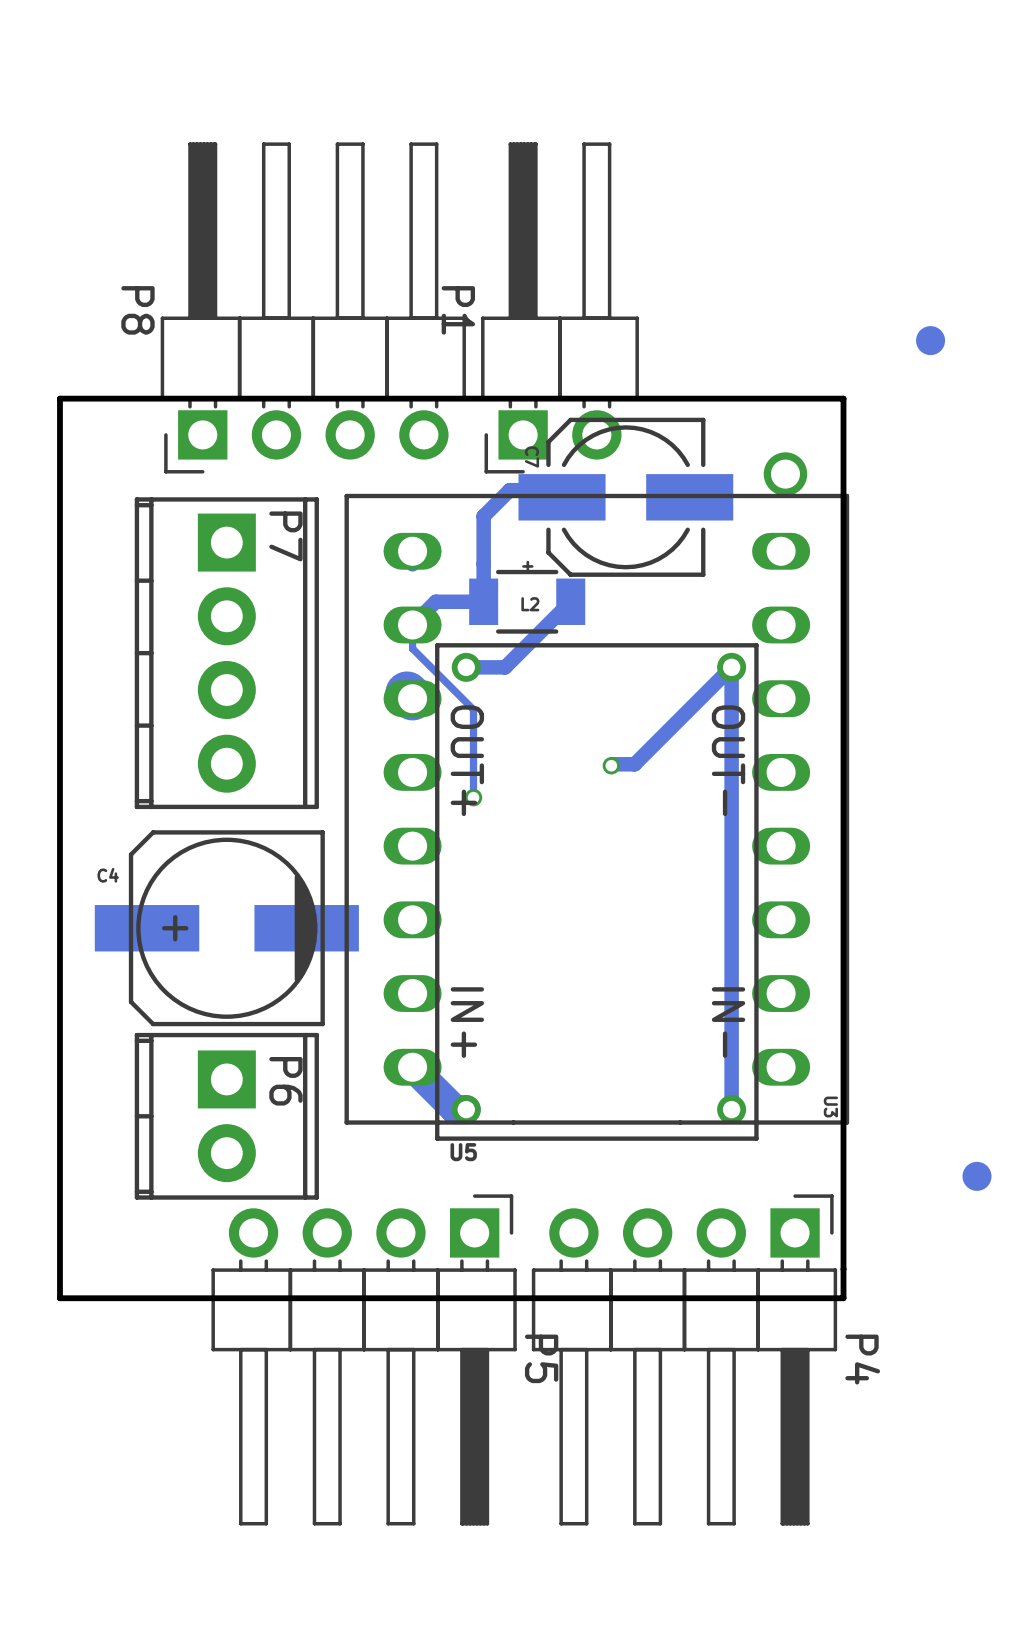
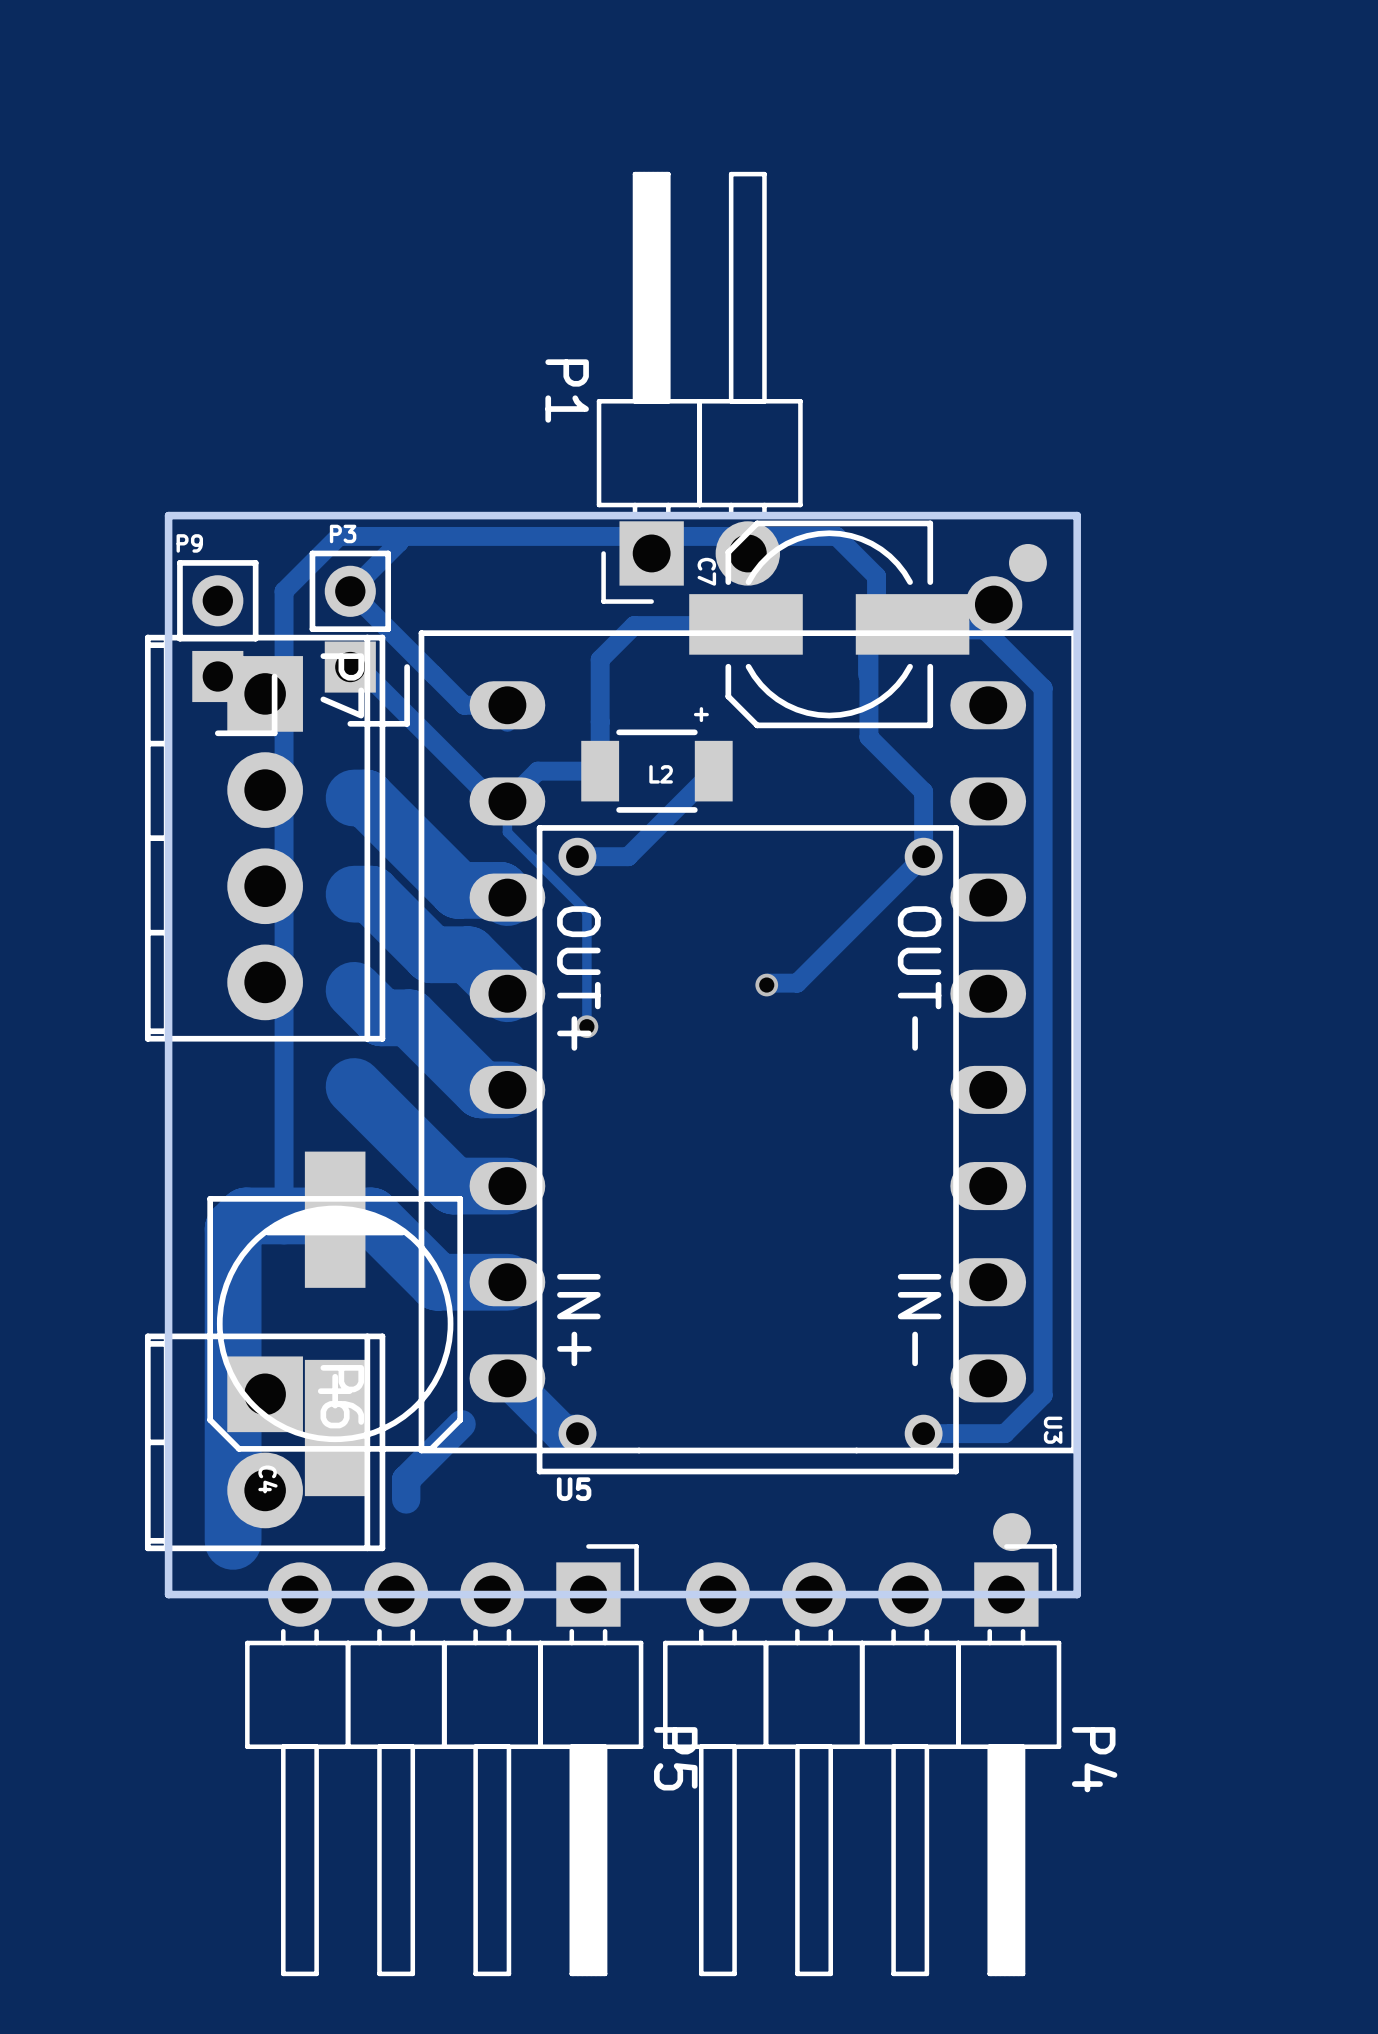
P8: (313, 307) -> none
part position: (930, 340) -> (1027, 562)
board edge: (843, 398) (843, 1298) (59, 1298) (59, 398) (843, 398) -> (1077, 515) (1077, 1594) (168, 1594) (168, 515) (1077, 515)
track: none -> (399, 536) (399, 542) (350, 591) (464, 705) (507, 705)
track: none -> (876, 625) (876, 576) (836, 536) (338, 536) (284, 591) (284, 1215)
track: none -> (868, 631) (868, 737) (923, 791) (923, 856)
C7 position: (625, 497) -> (829, 624)
P3: none -> (359, 638)
P9: none -> (227, 648)
track: none -> (350, 667) (359, 667) (493, 801)
track: none -> (354, 798) (365, 798) (458, 890) (500, 890)
track: (731, 667) (731, 1109) -> (867, 674) (867, 625) (943, 625) (947, 629) (984, 629) (1043, 688) (1043, 1395) (1004, 1433) (923, 1433)
track: none -> (354, 894) (371, 894) (431, 954) (468, 954) (507, 993)
track: none -> (354, 990) (381, 1017) (409, 1017) (481, 1089) (507, 1089)
track: none -> (354, 1086) (453, 1186) (507, 1186)
C4 rotation: 0° (226, 928) -> 90° counterclockwise (335, 1323)
track: none -> (371, 1215) (246, 1215) (233, 1229) (233, 1541)
track: none -> (371, 1215) (437, 1282) (507, 1282)
track: none -> (461, 1424) (406, 1479) (406, 1499)
part position: (976, 1176) -> (1011, 1532)

